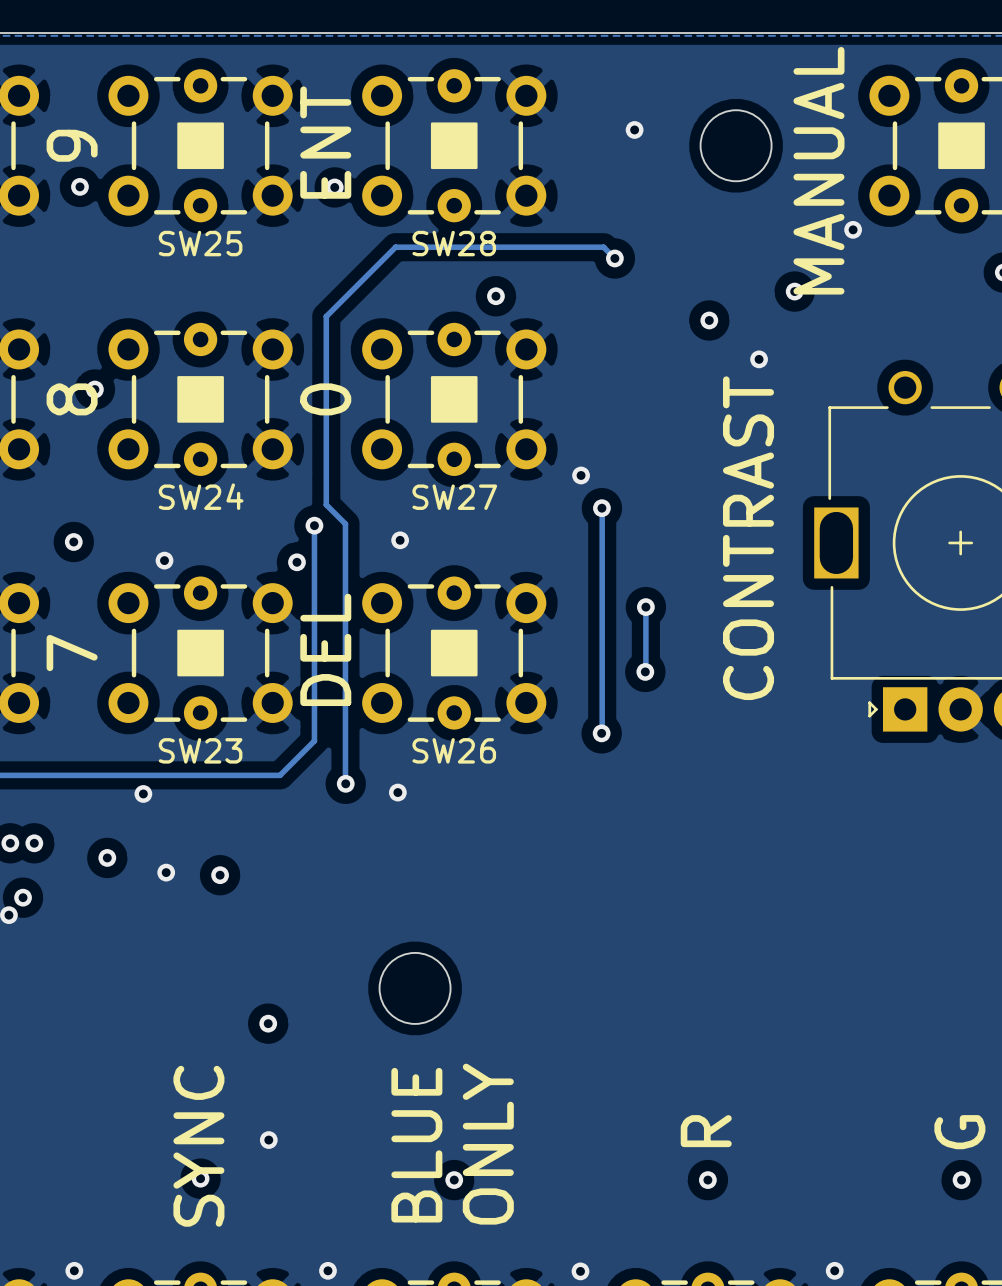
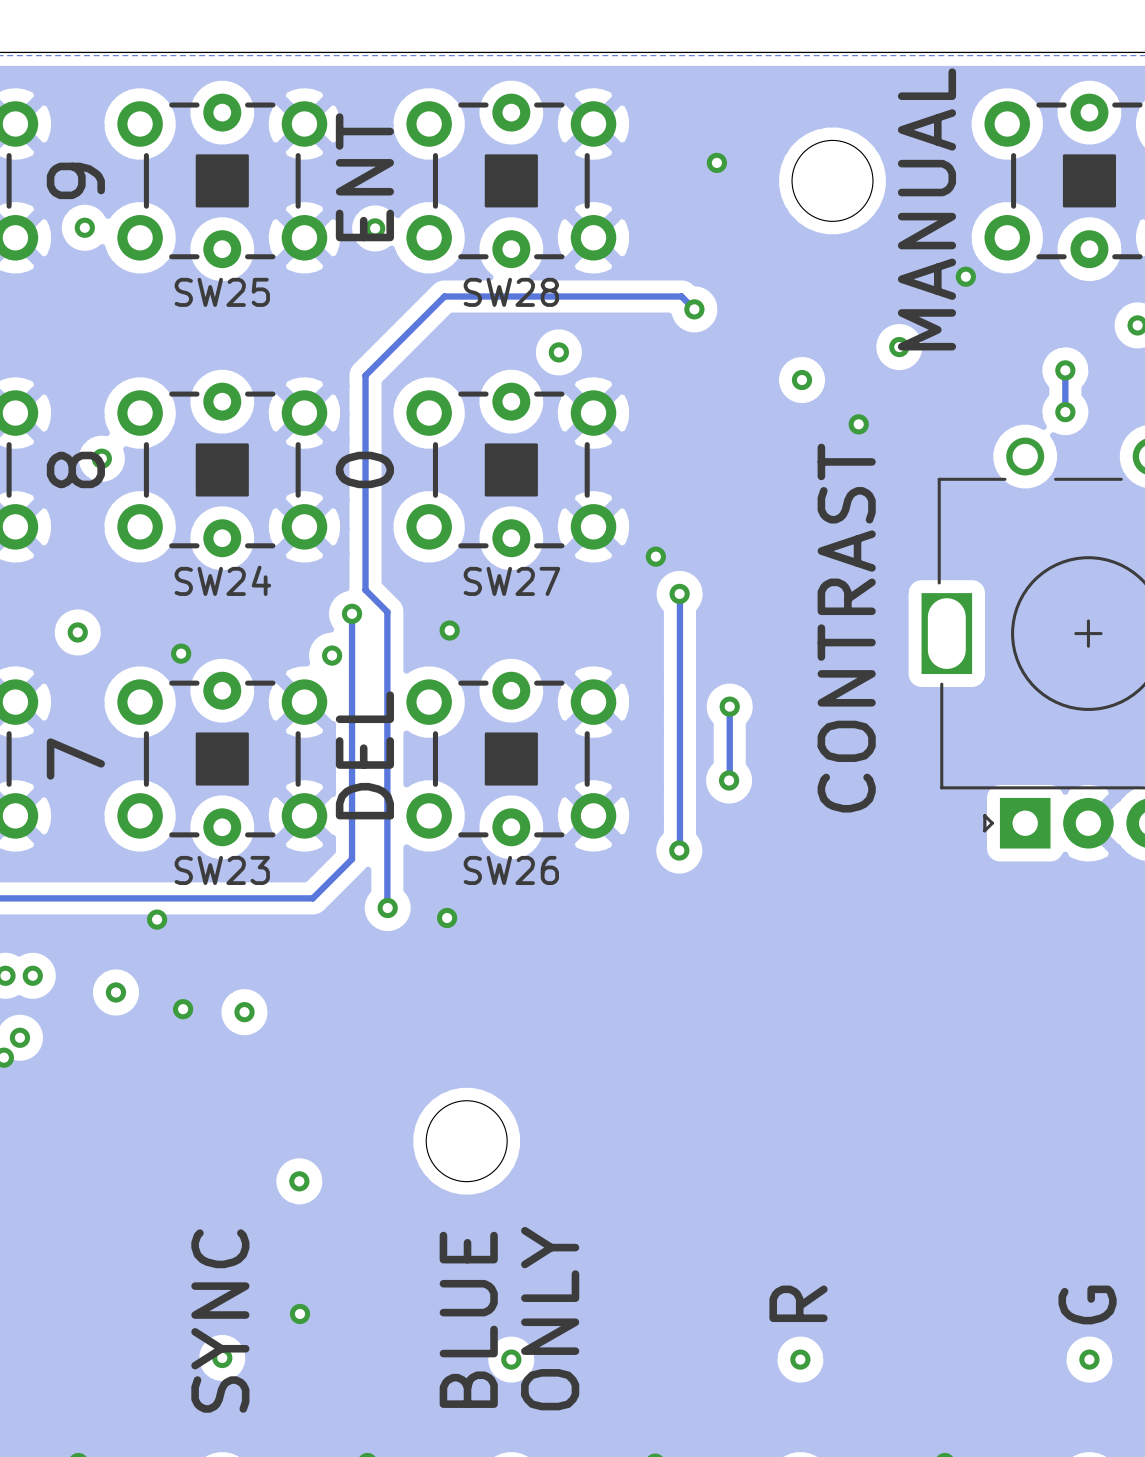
track: none -> (1065, 370) (1065, 412)
via: none -> (1065, 370)
via: none -> (1065, 412)

